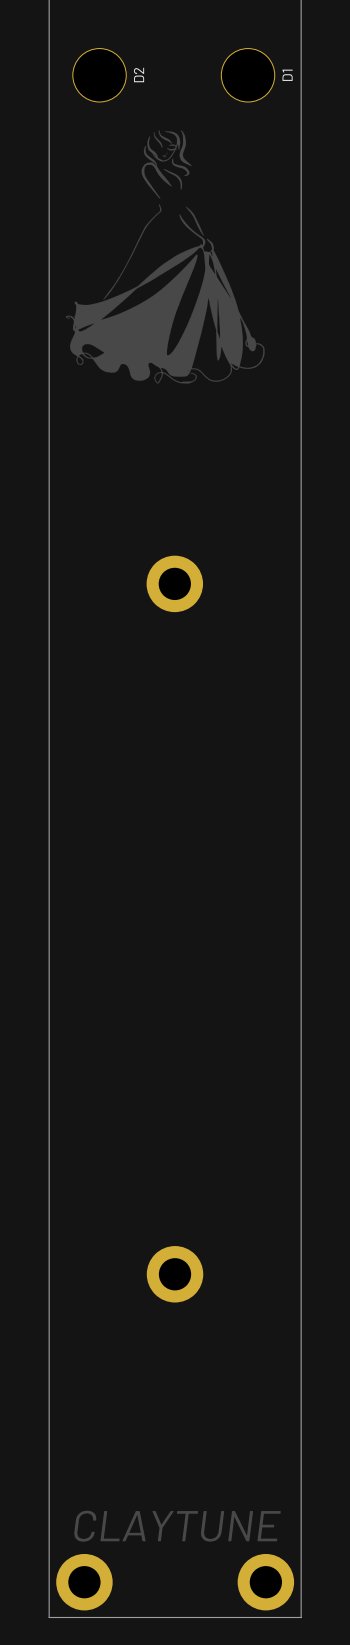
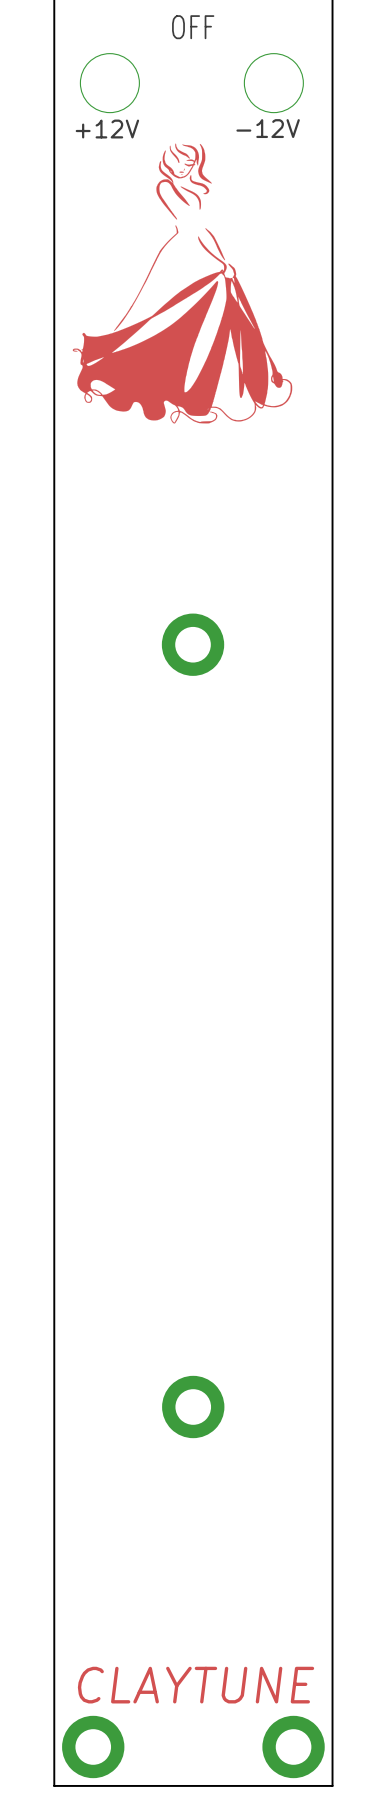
text: none -> OFF (193, 27)
D2 name: D2 (139, 75) -> +12V (107, 129)
D1 name: D1 (287, 75) -> -12V (268, 128)

